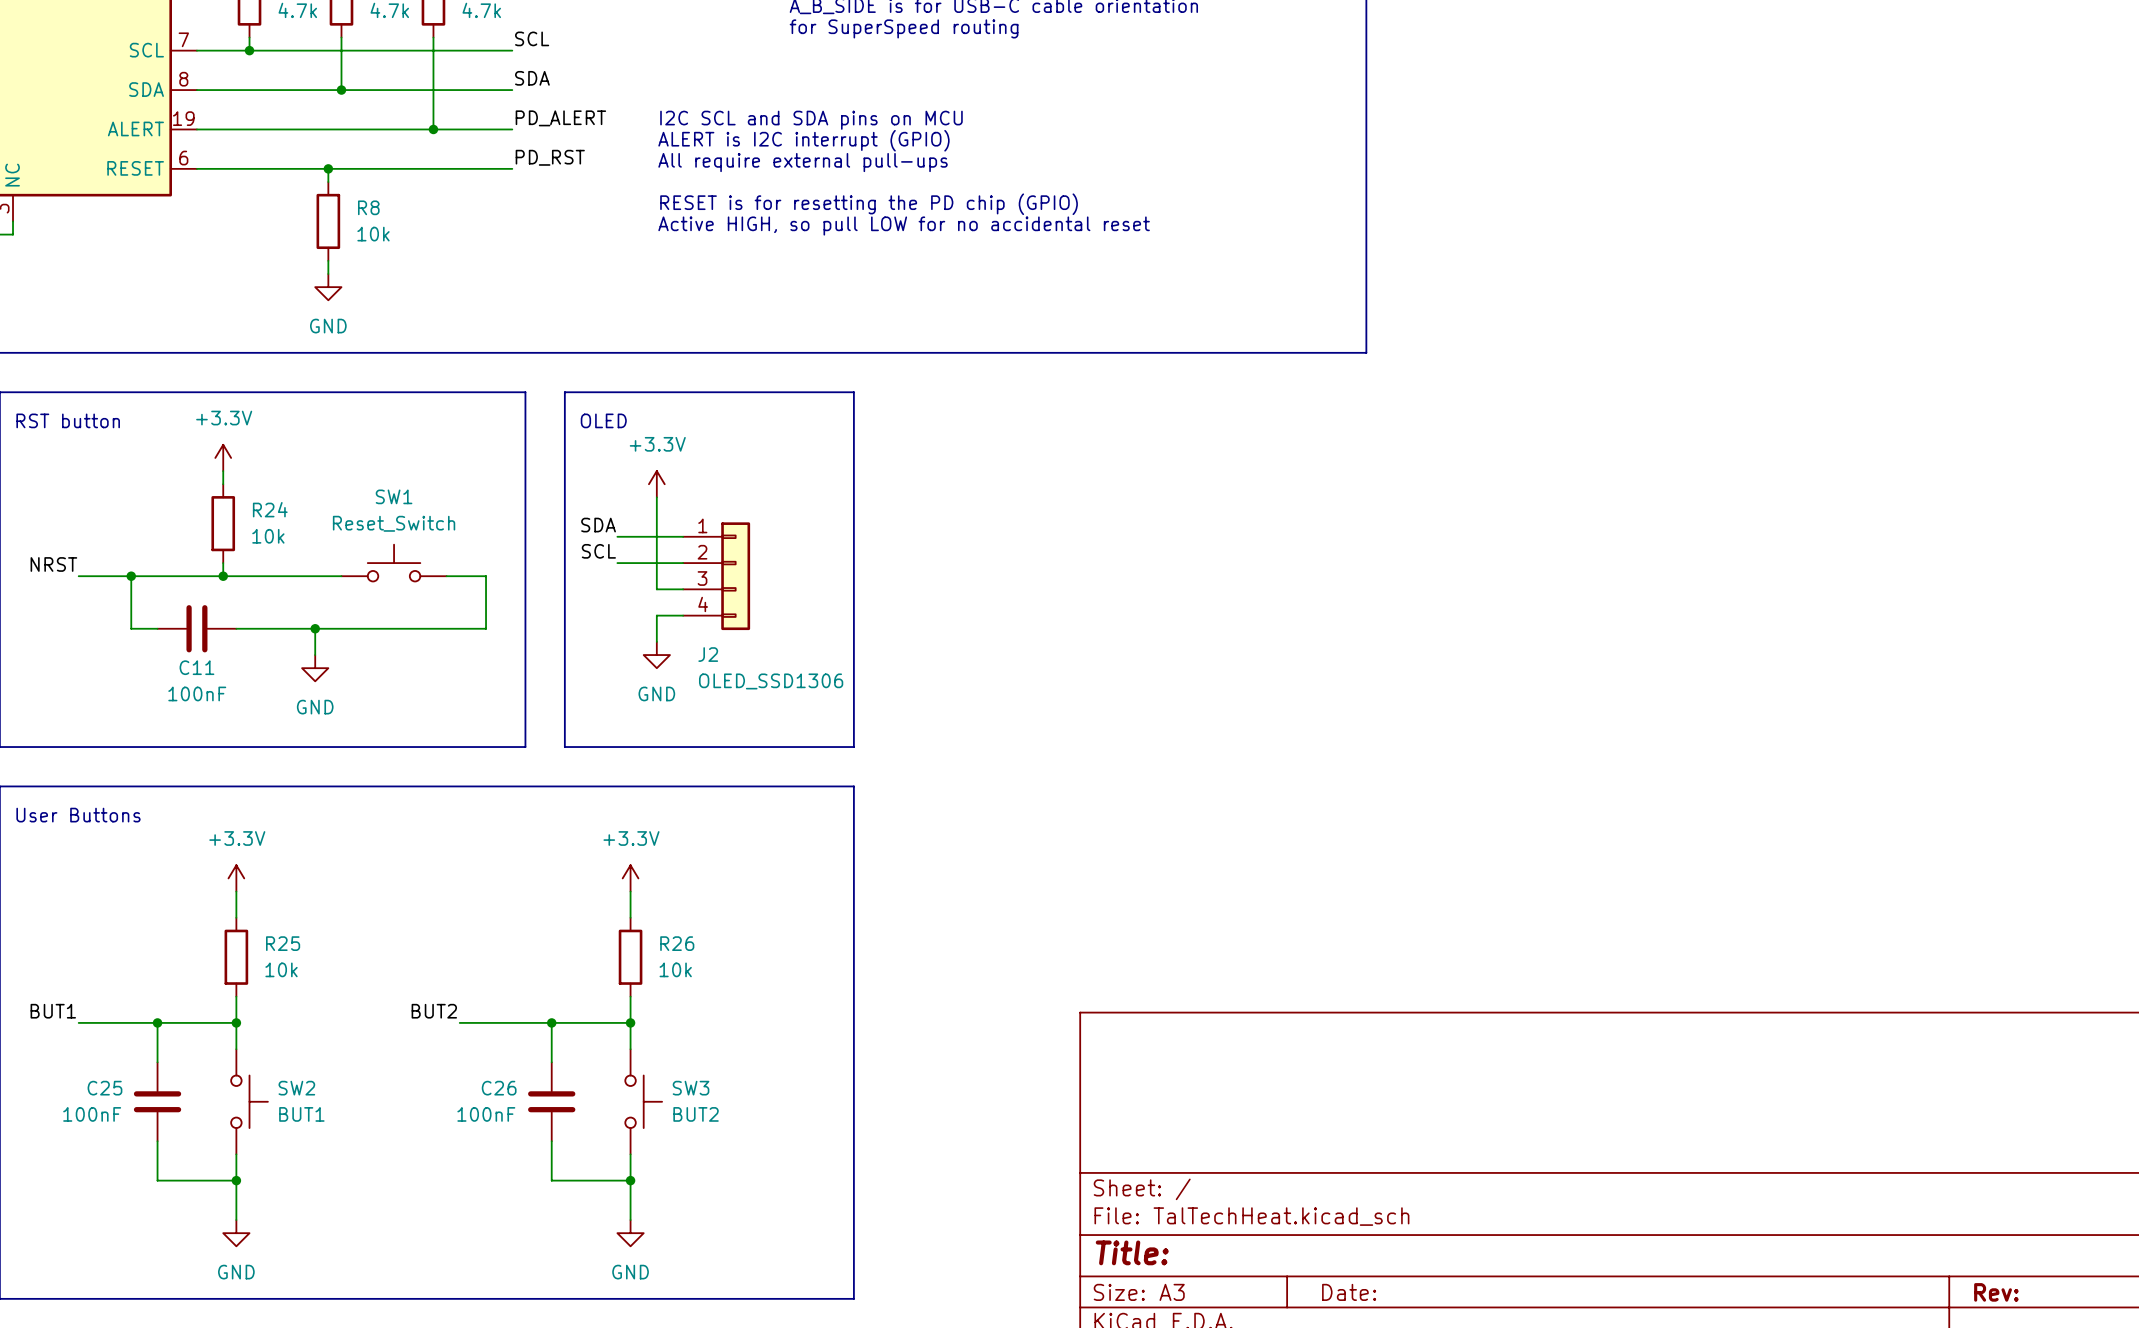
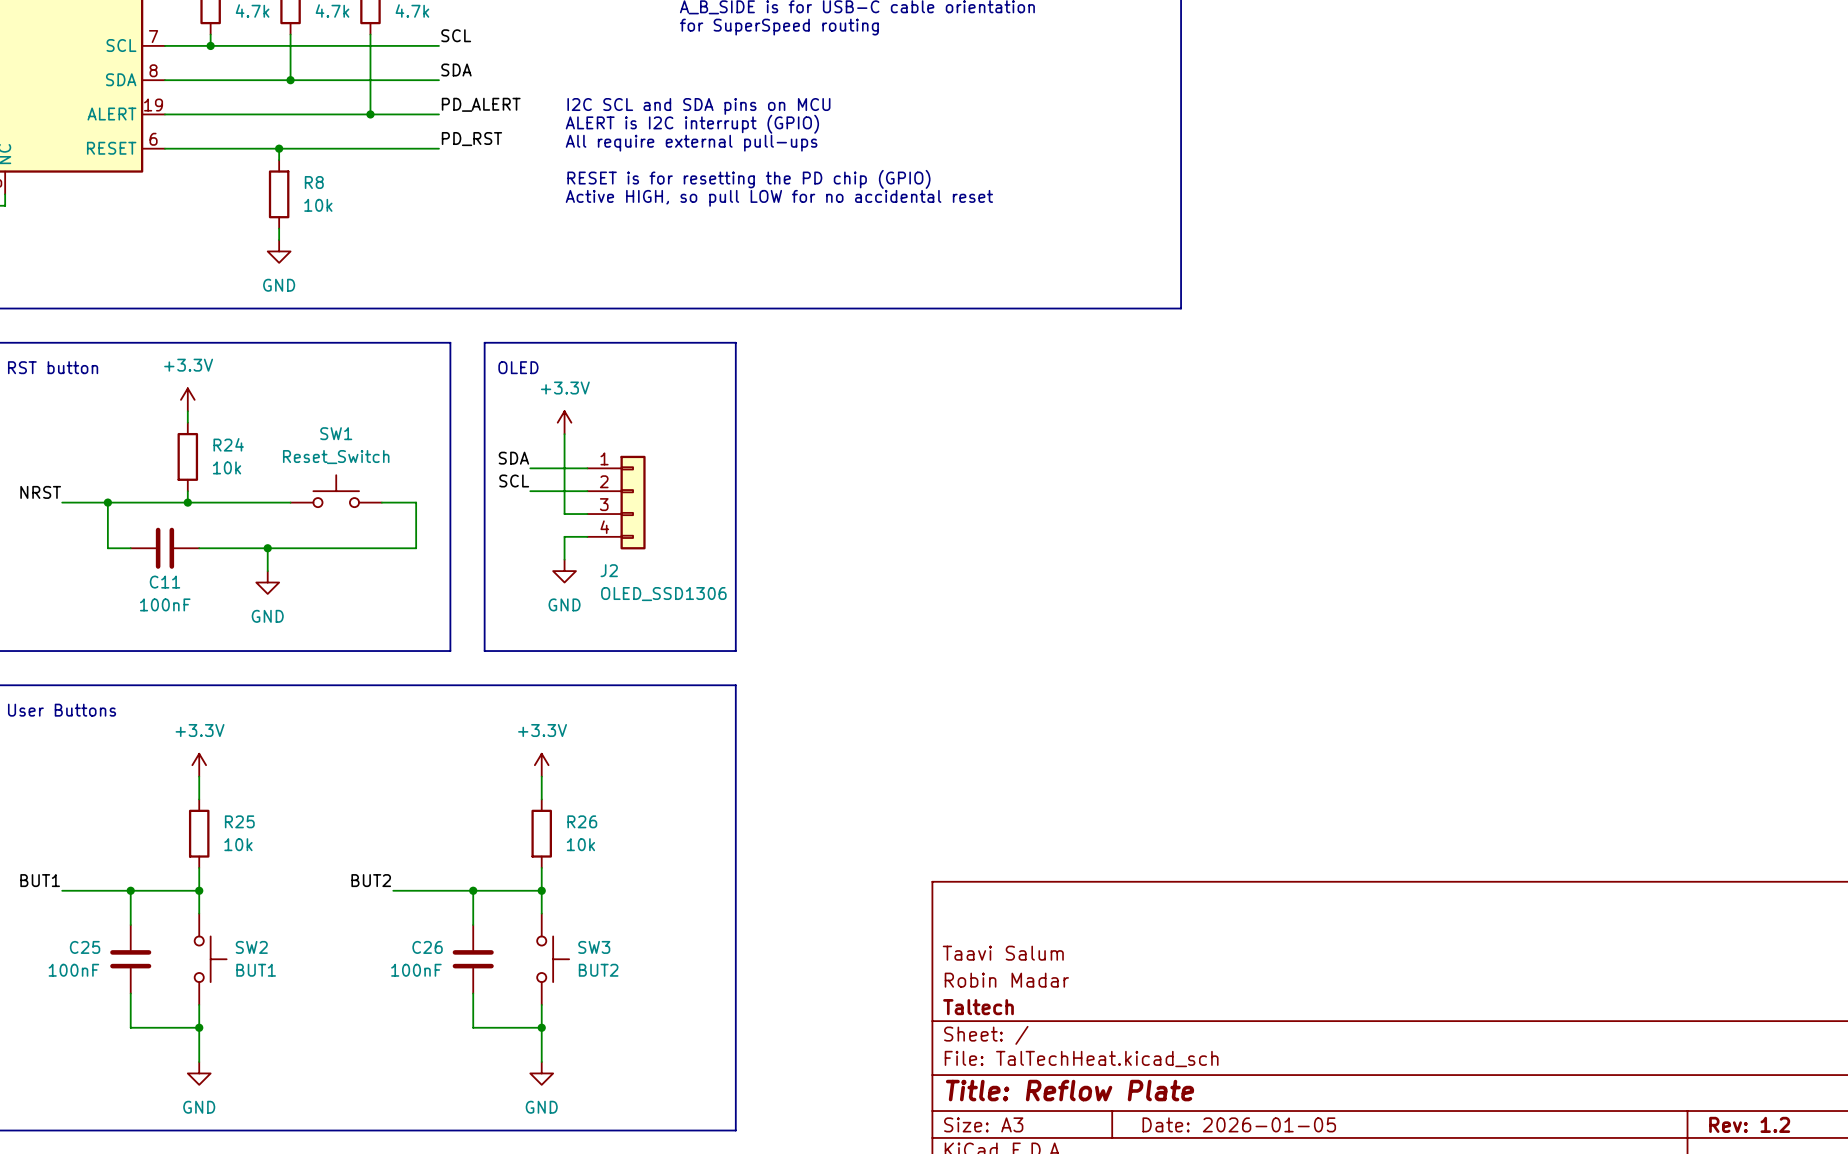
title block: none -> Taavi Salum (1003, 953)
title block: none -> Robin Madar (1006, 980)
title block: none -> Taltech (978, 1007)
title block: Title: (1132, 1252) -> Title: Reflow Plate (1070, 1090)
title block: Date: (1349, 1292) -> Date: 2026-01-05 (1239, 1124)
title block: Rev: (1996, 1292) -> Rev: 1.2 (1749, 1124)

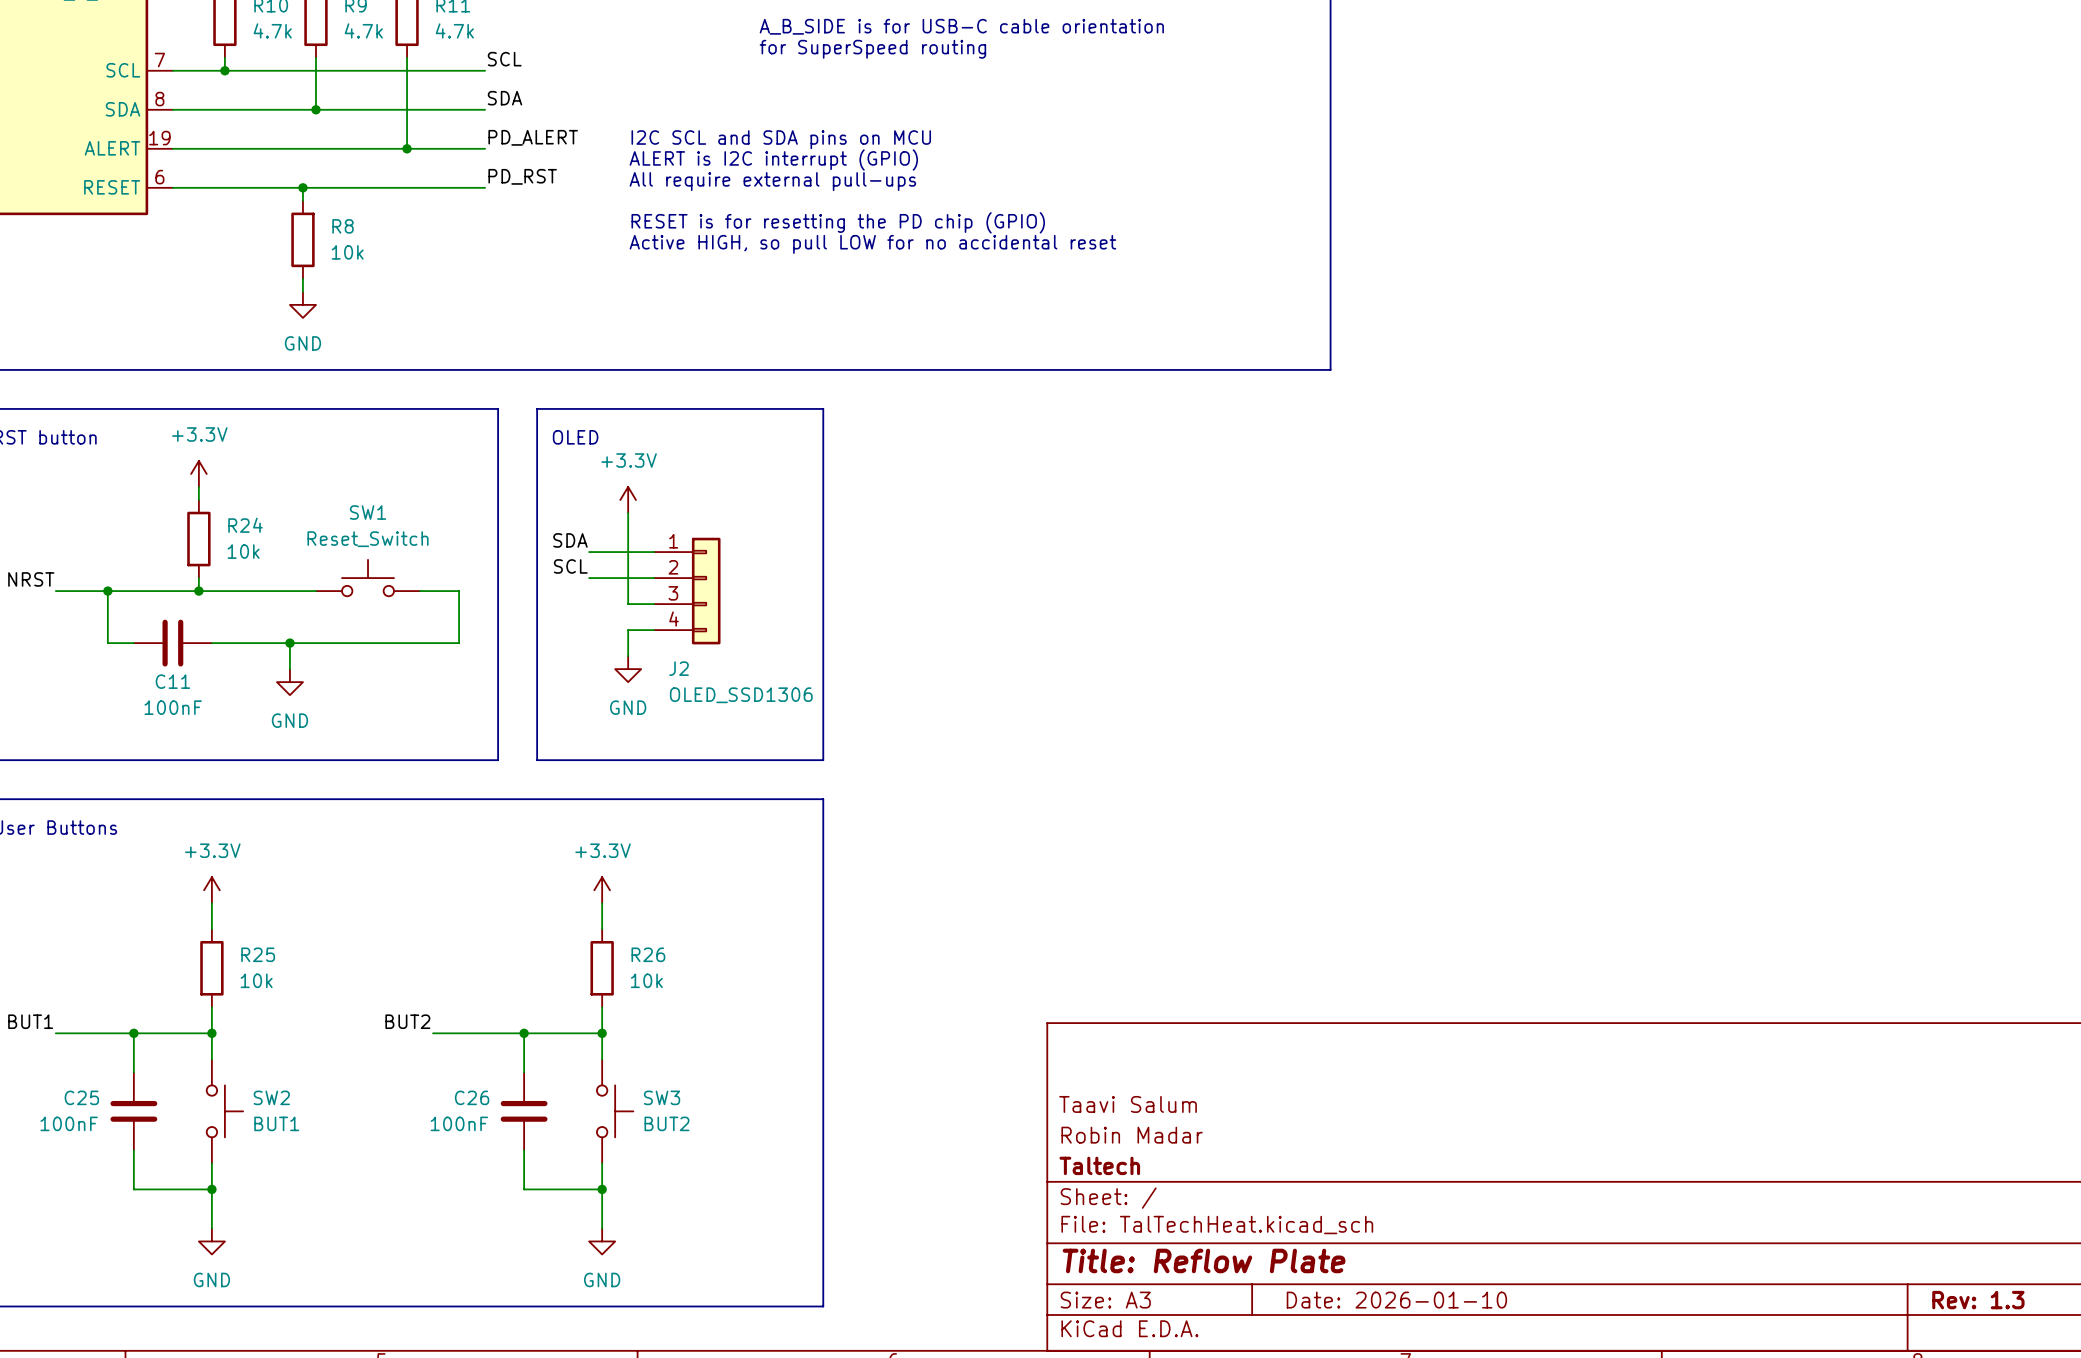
title block: Date: 2026-01-05 (1239, 1124) -> Date: 2026-01-10 (1396, 1300)
title block: Rev: 1.2 (1749, 1124) -> Rev: 1.3 (1978, 1300)

